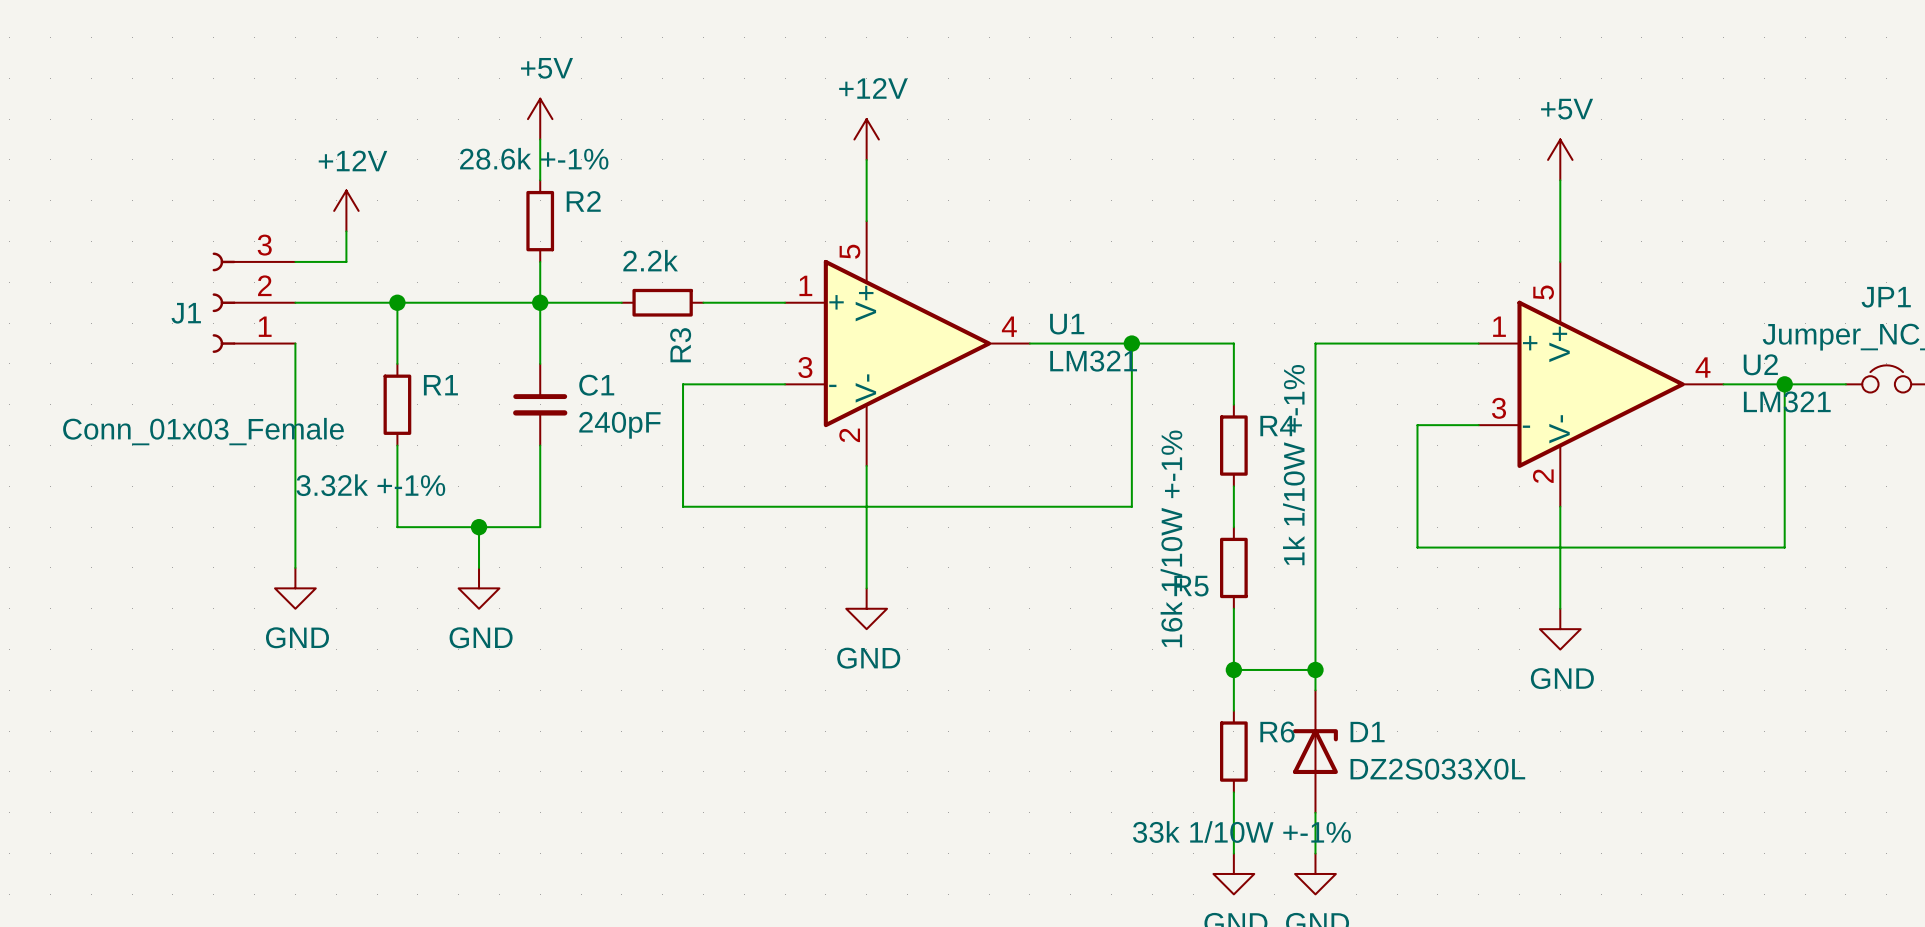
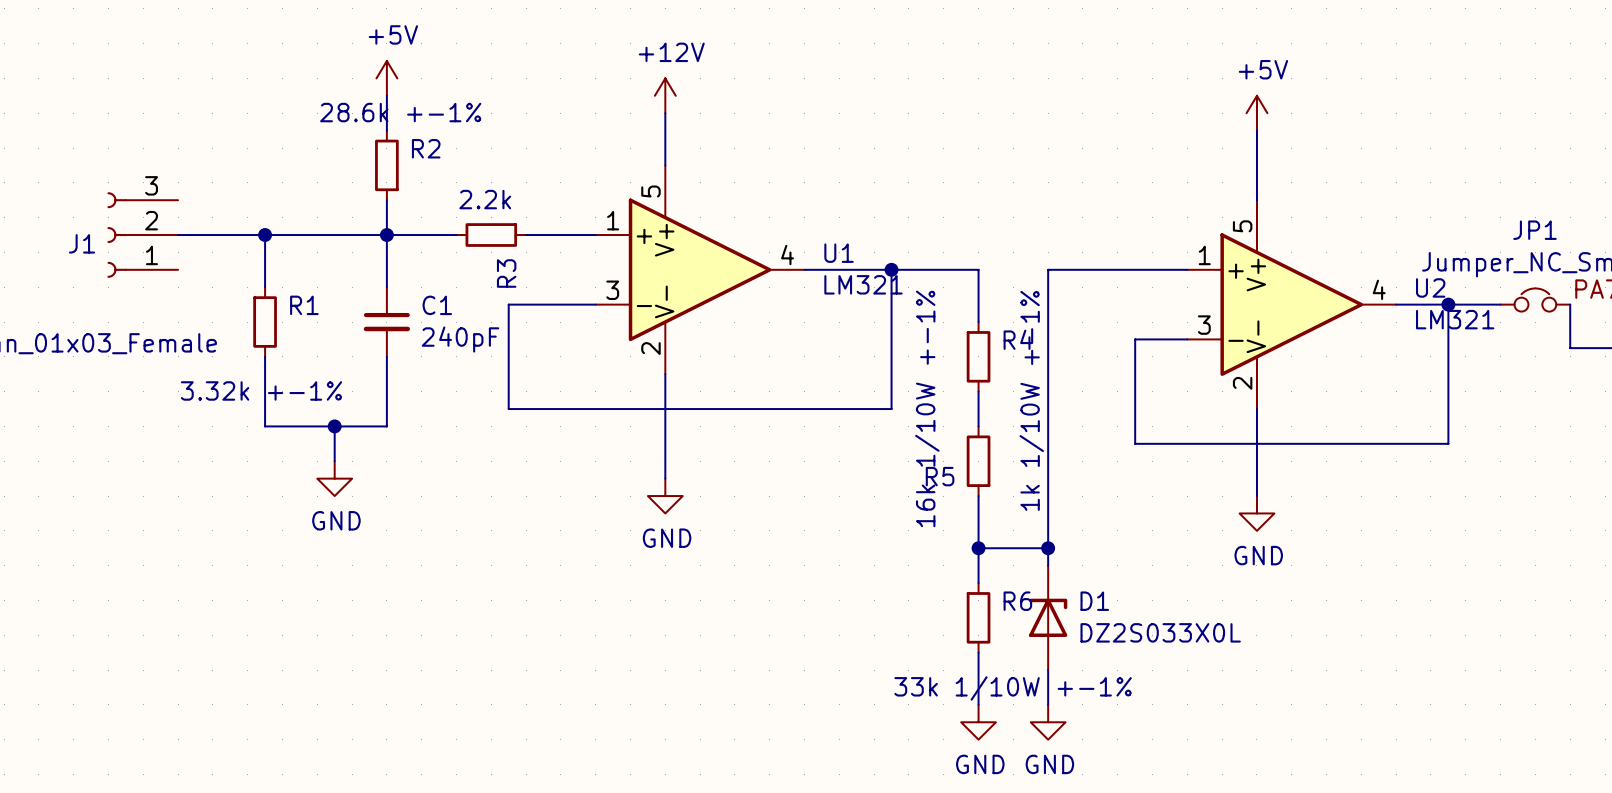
power symbol: +12V (346, 210) -> none
wire: (346, 231) (346, 261) (295, 261) -> none
wire: (295, 343) (295, 567) -> none
power symbol: GND (295, 588) -> none

